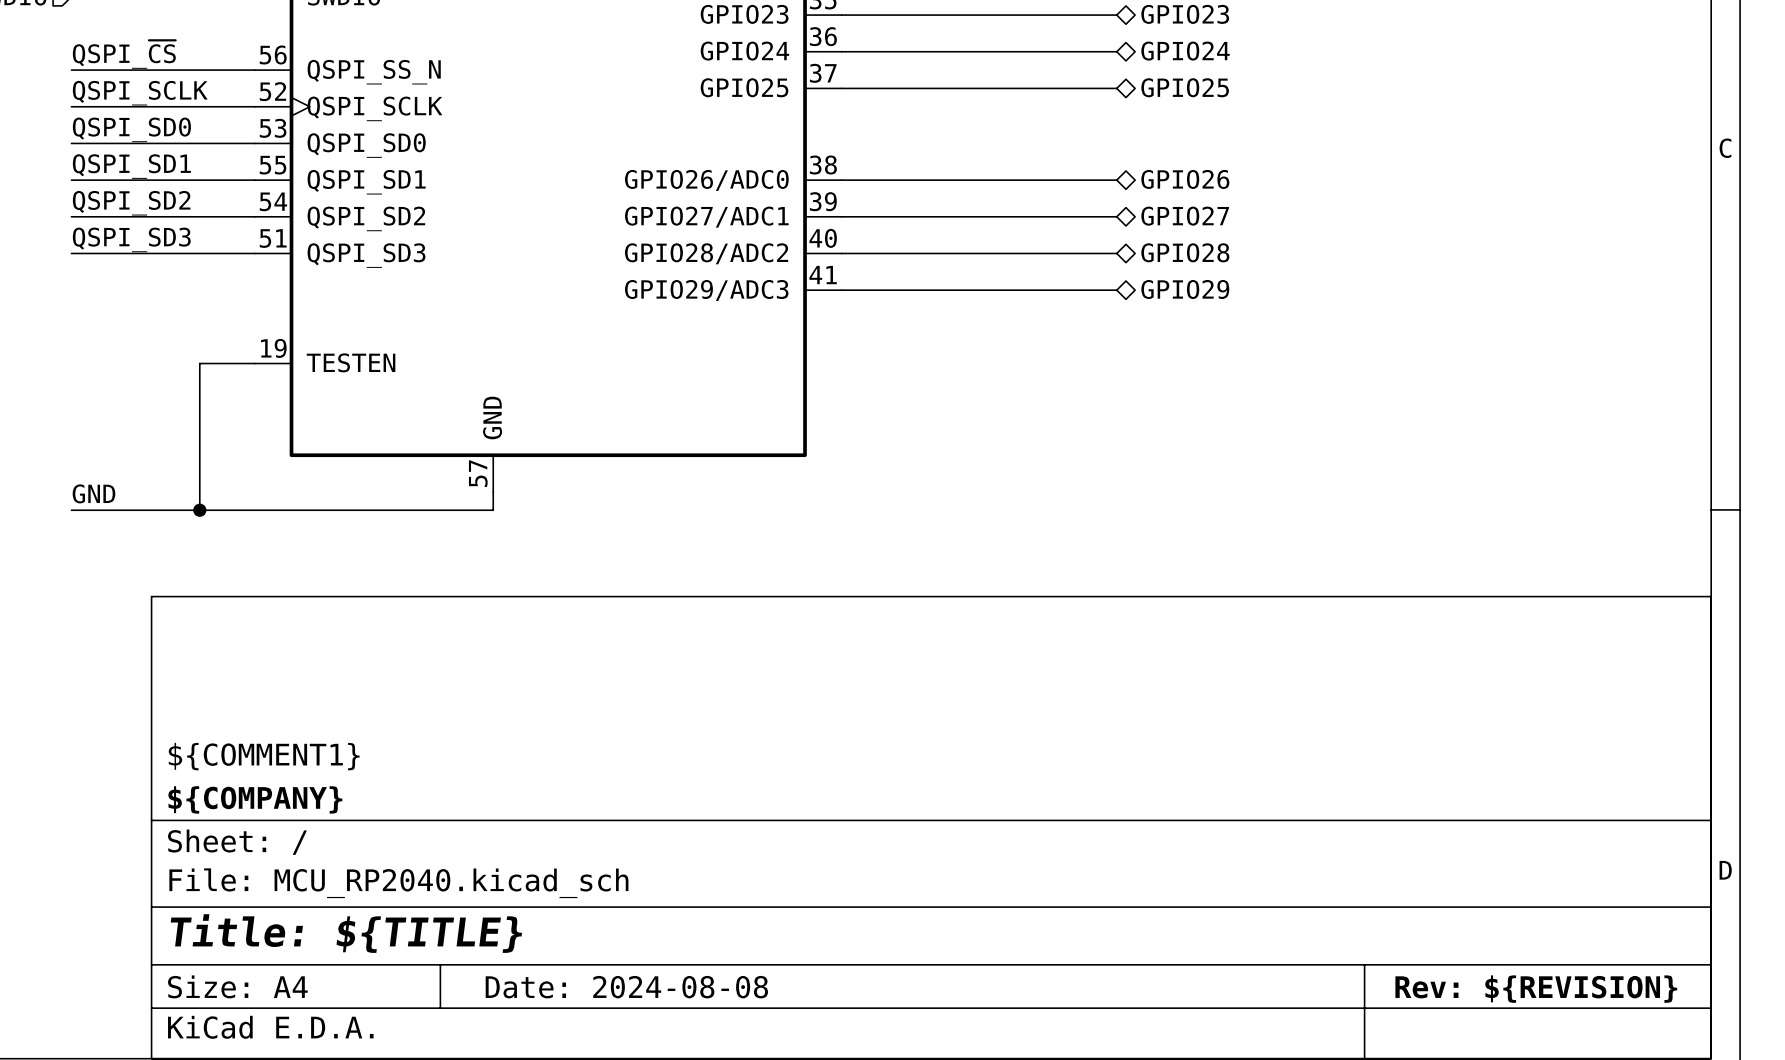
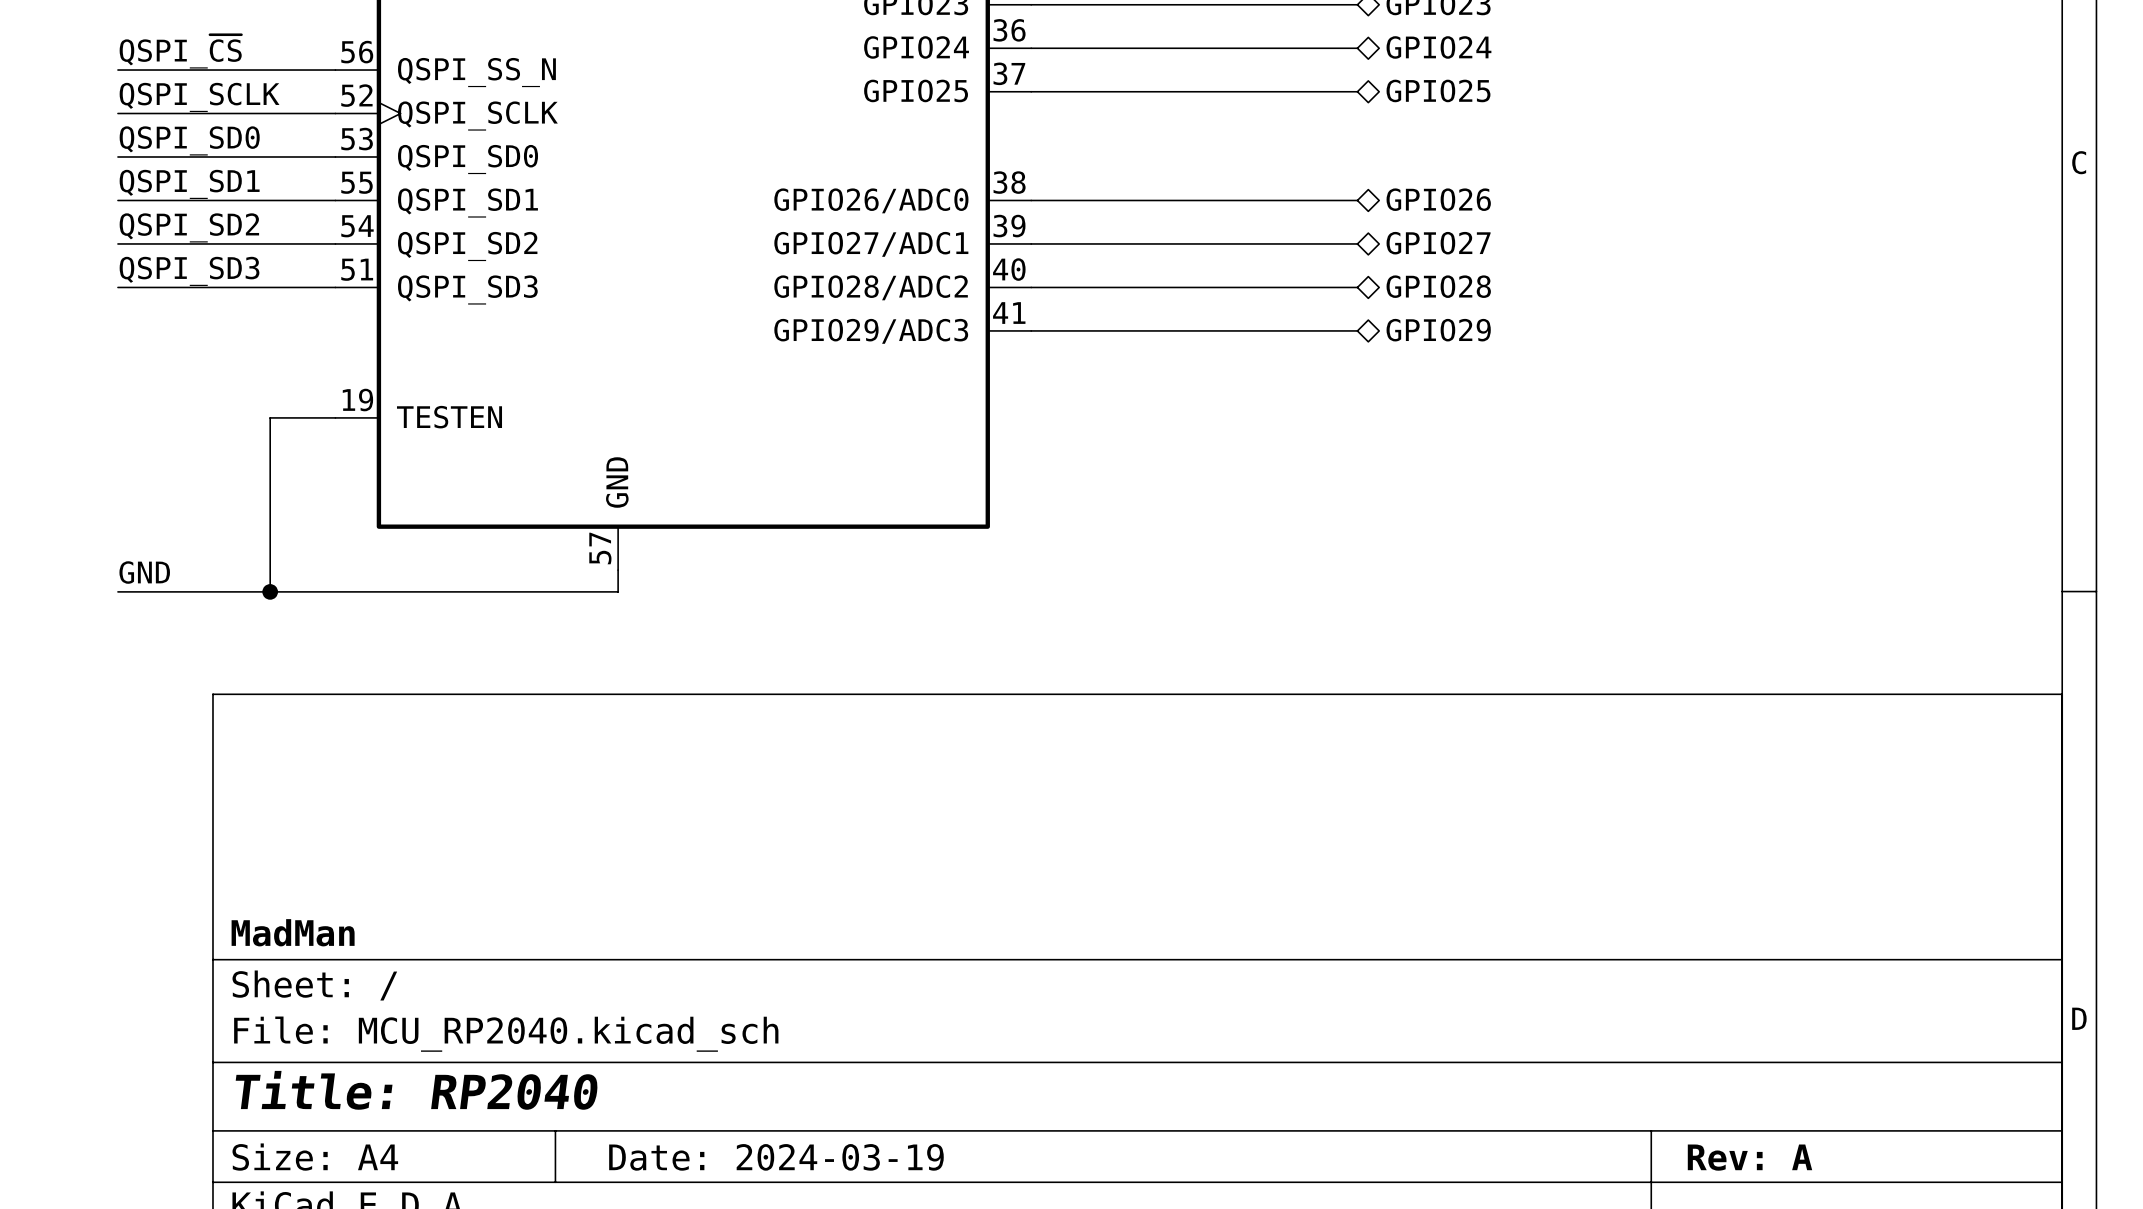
title block: ${COMMENT1} (264, 756) -> none
title block: ${COMPANY} (255, 799) -> MadMan (293, 932)
title block: Title: ${TITLE} (346, 933) -> Title: RP2040 (416, 1090)
title block: Date: 2024-08-08 (626, 987) -> Date: 2024-03-19 (776, 1157)
title block: Rev: ${REVISION} (1536, 989) -> Rev: A (1750, 1157)

